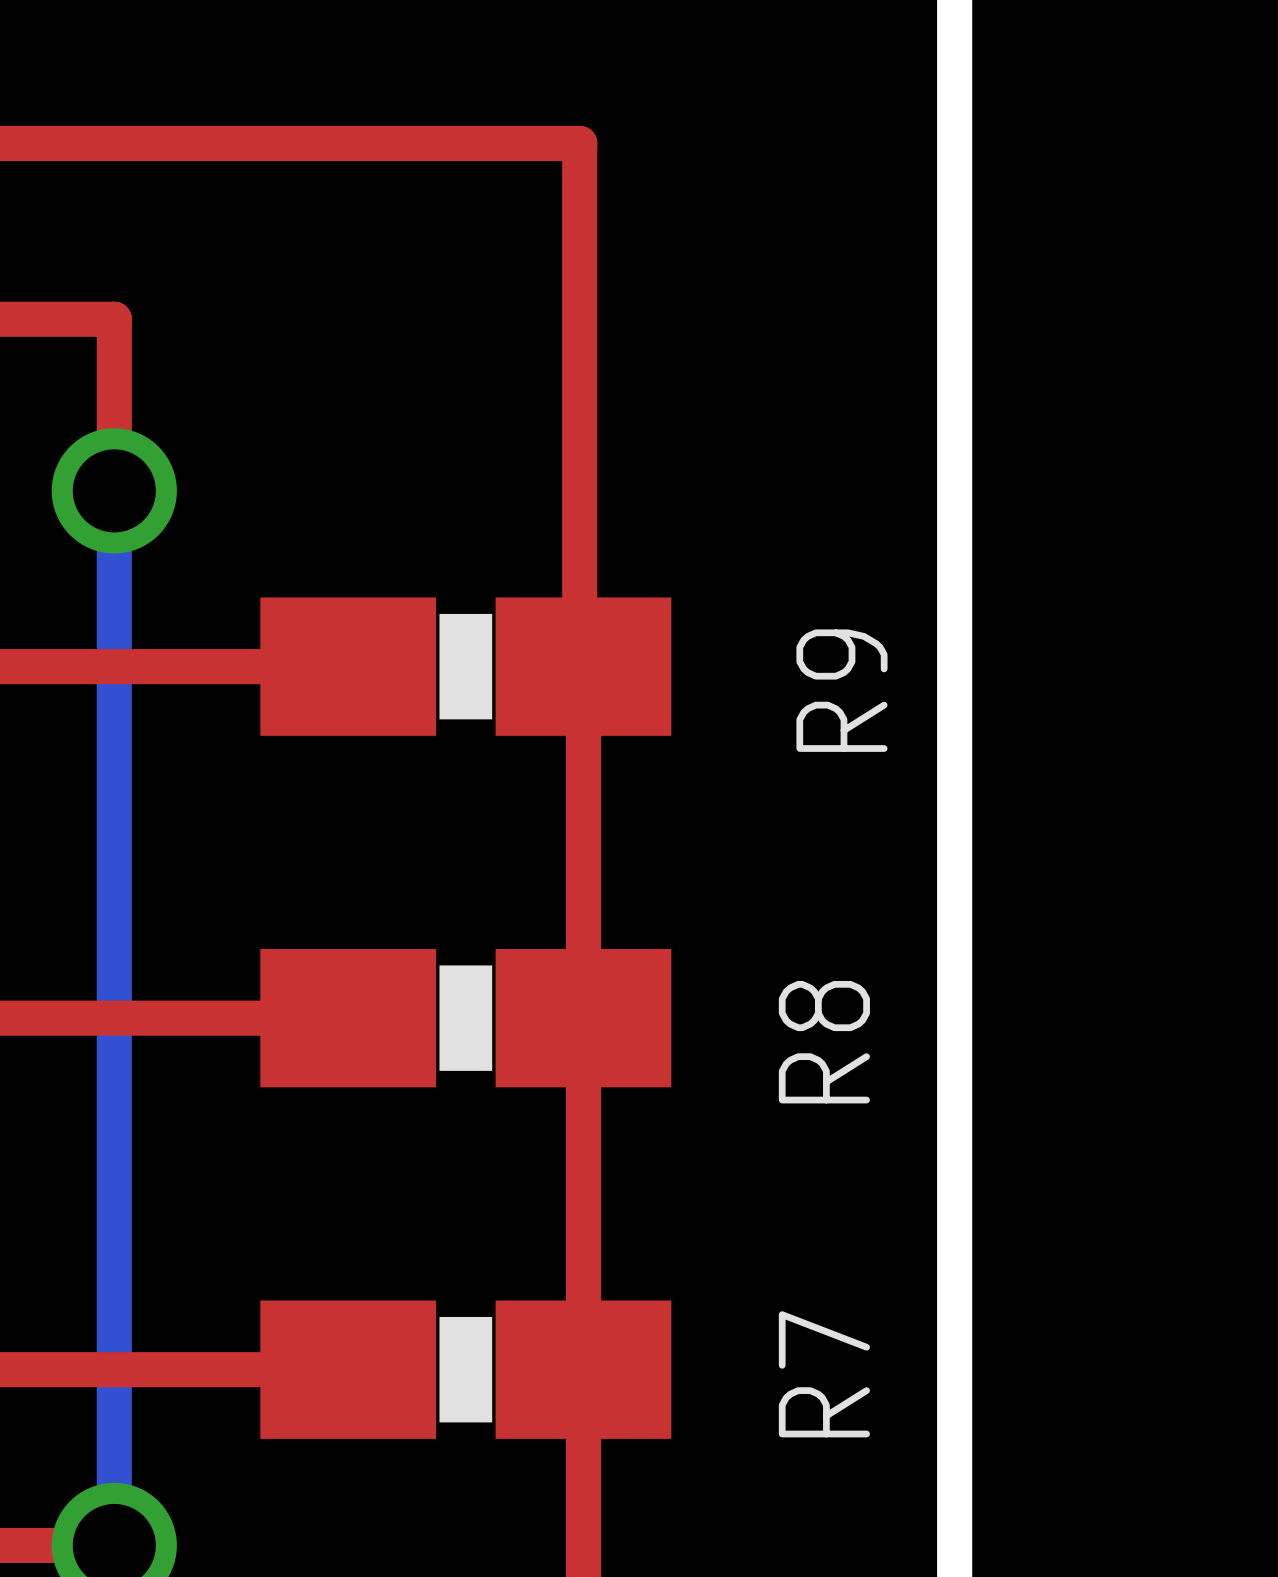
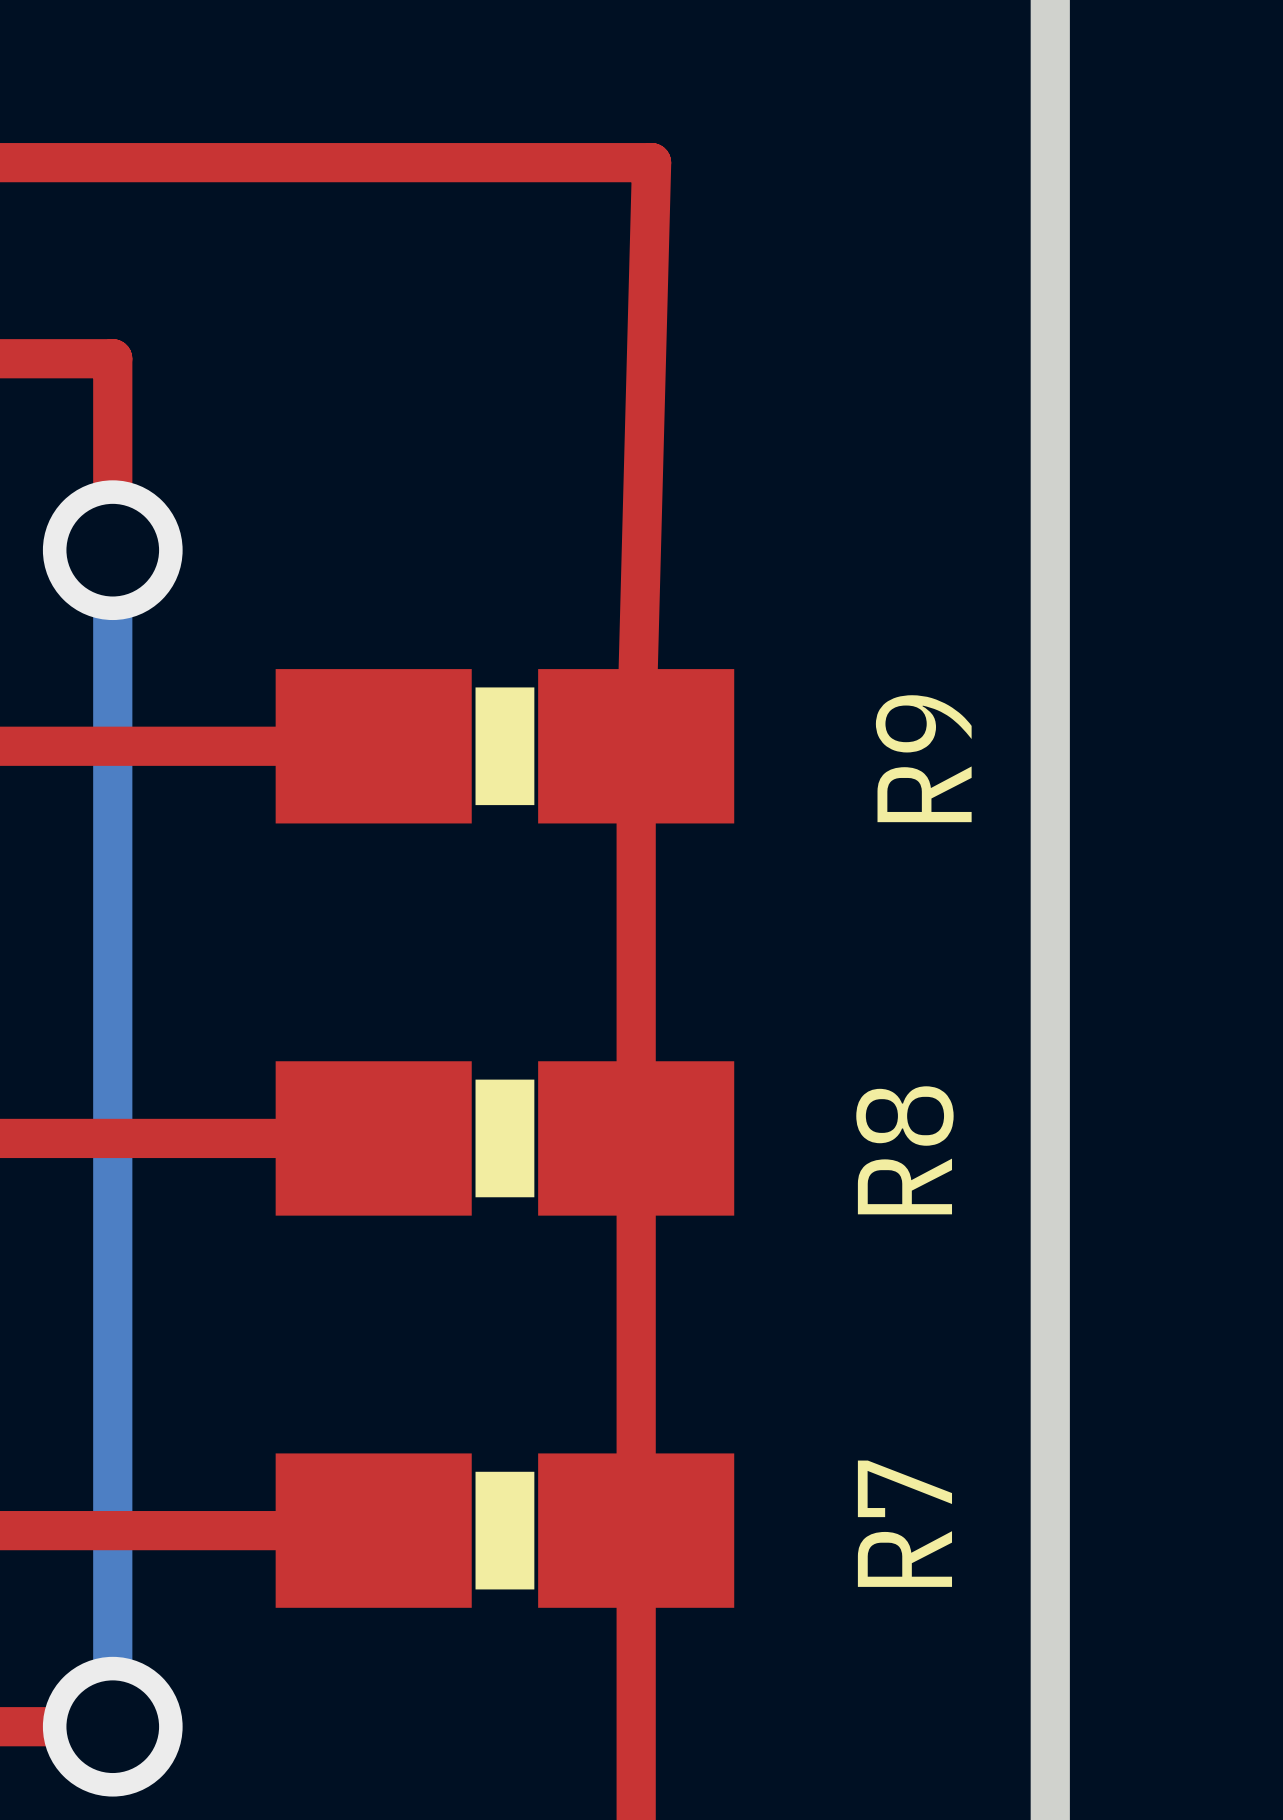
top track: (579, 143) (579, 662) (583, 666) -> (632, 162) (651, 162) (636, 746)

